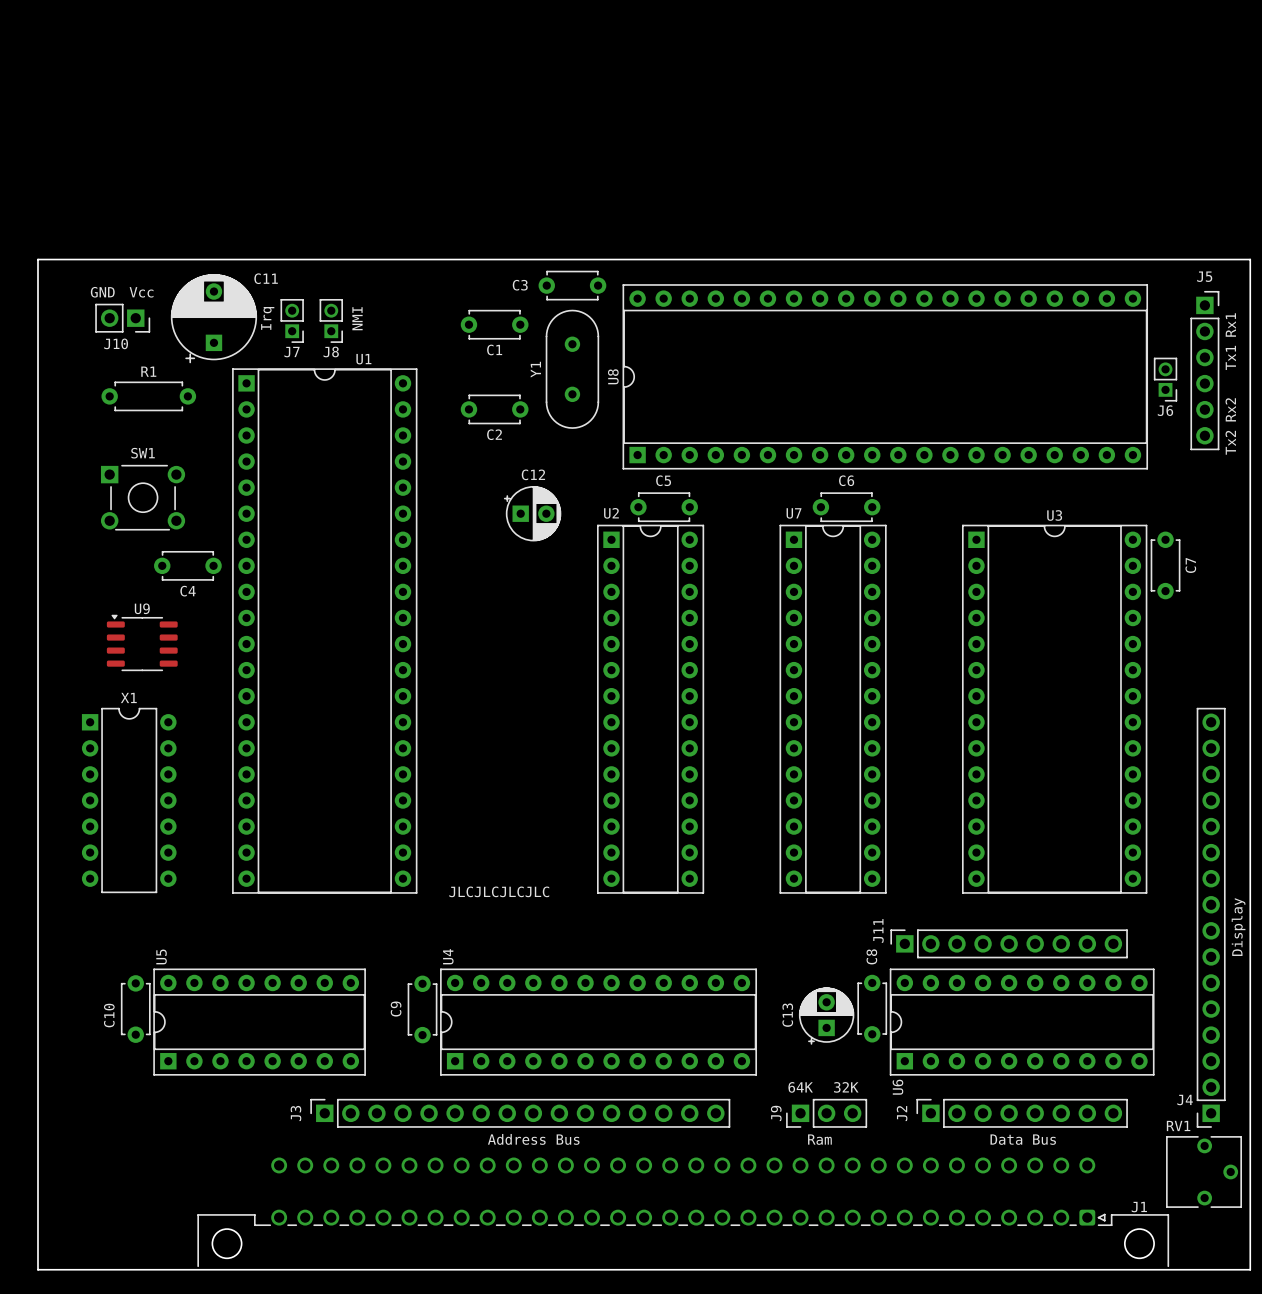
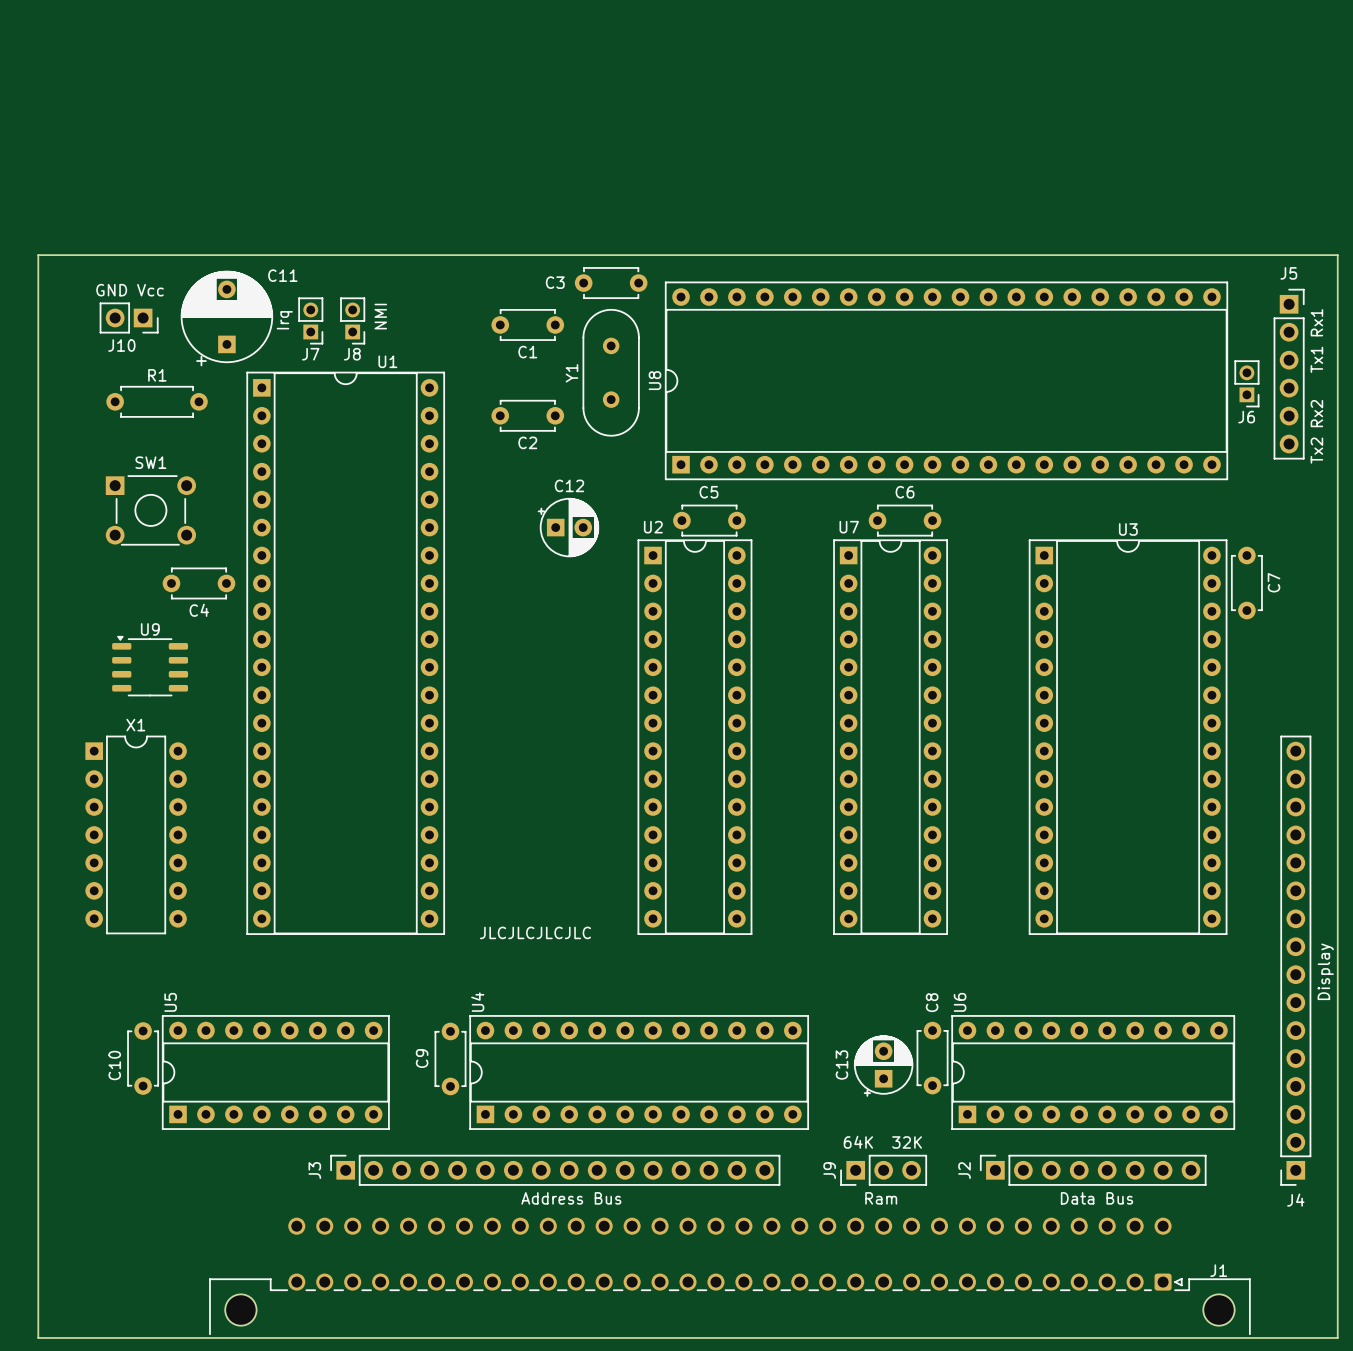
J11: (1009, 943) -> none
U6 name position: U6 (897, 1087) -> U6 (960, 1002)
J4 name position: J4 (1185, 1100) -> J4 (1295, 1200)
RV1: (1204, 1171) -> none

